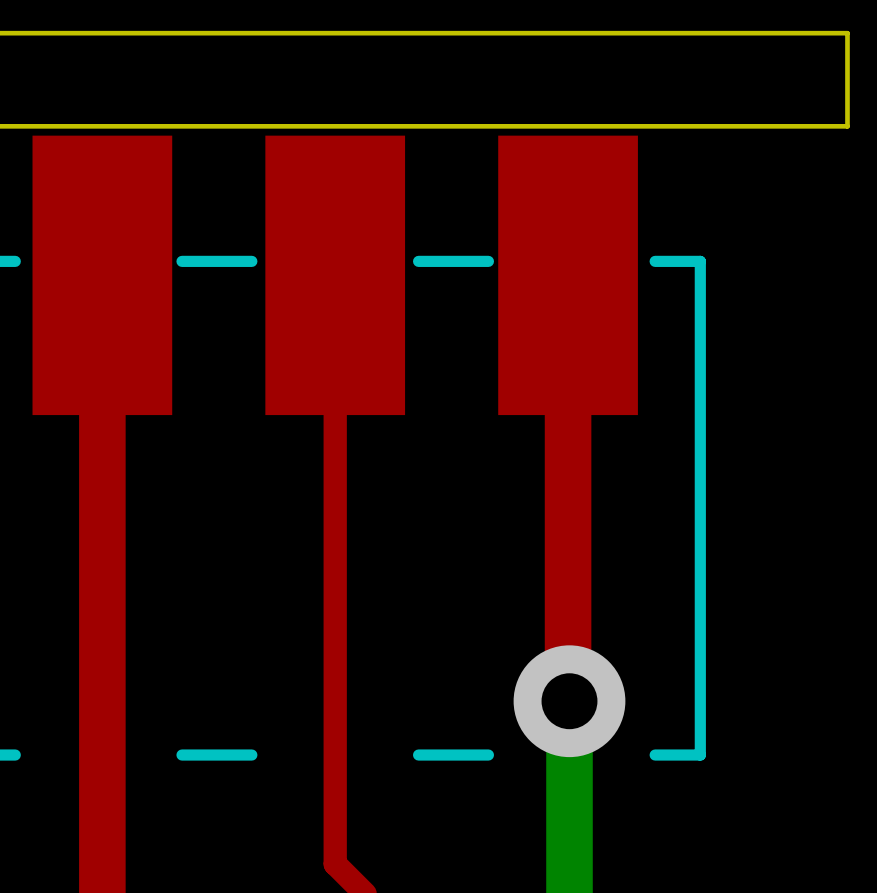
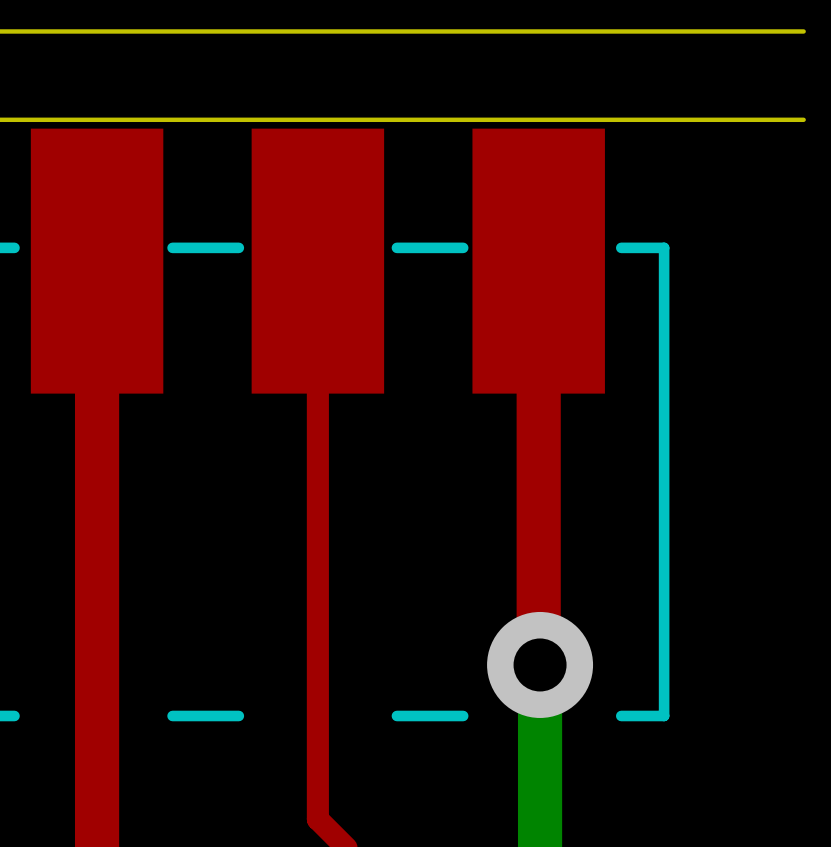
board edge: (847, 33) (847, 126) -> none

